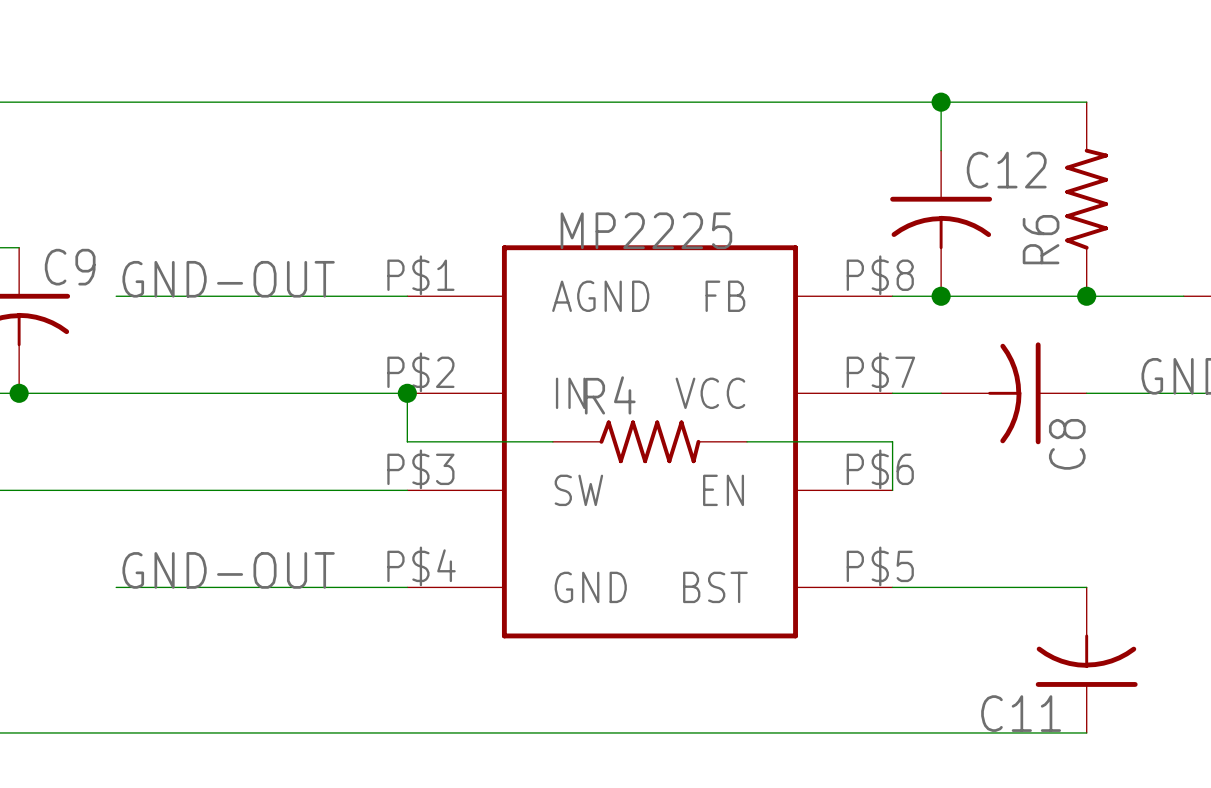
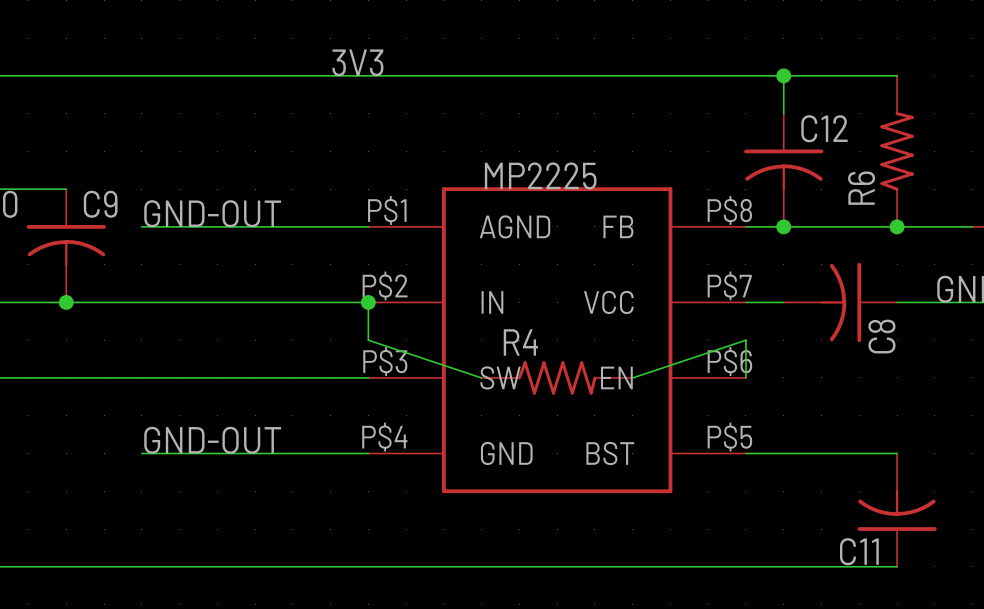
label: none -> 3V3 (357, 62)
wire: (407, 441) (552, 441) -> (368, 340) (481, 377)
R4 position: (649, 441) -> (557, 377)
wire: (747, 441) (892, 441) -> (632, 377) (745, 340)

